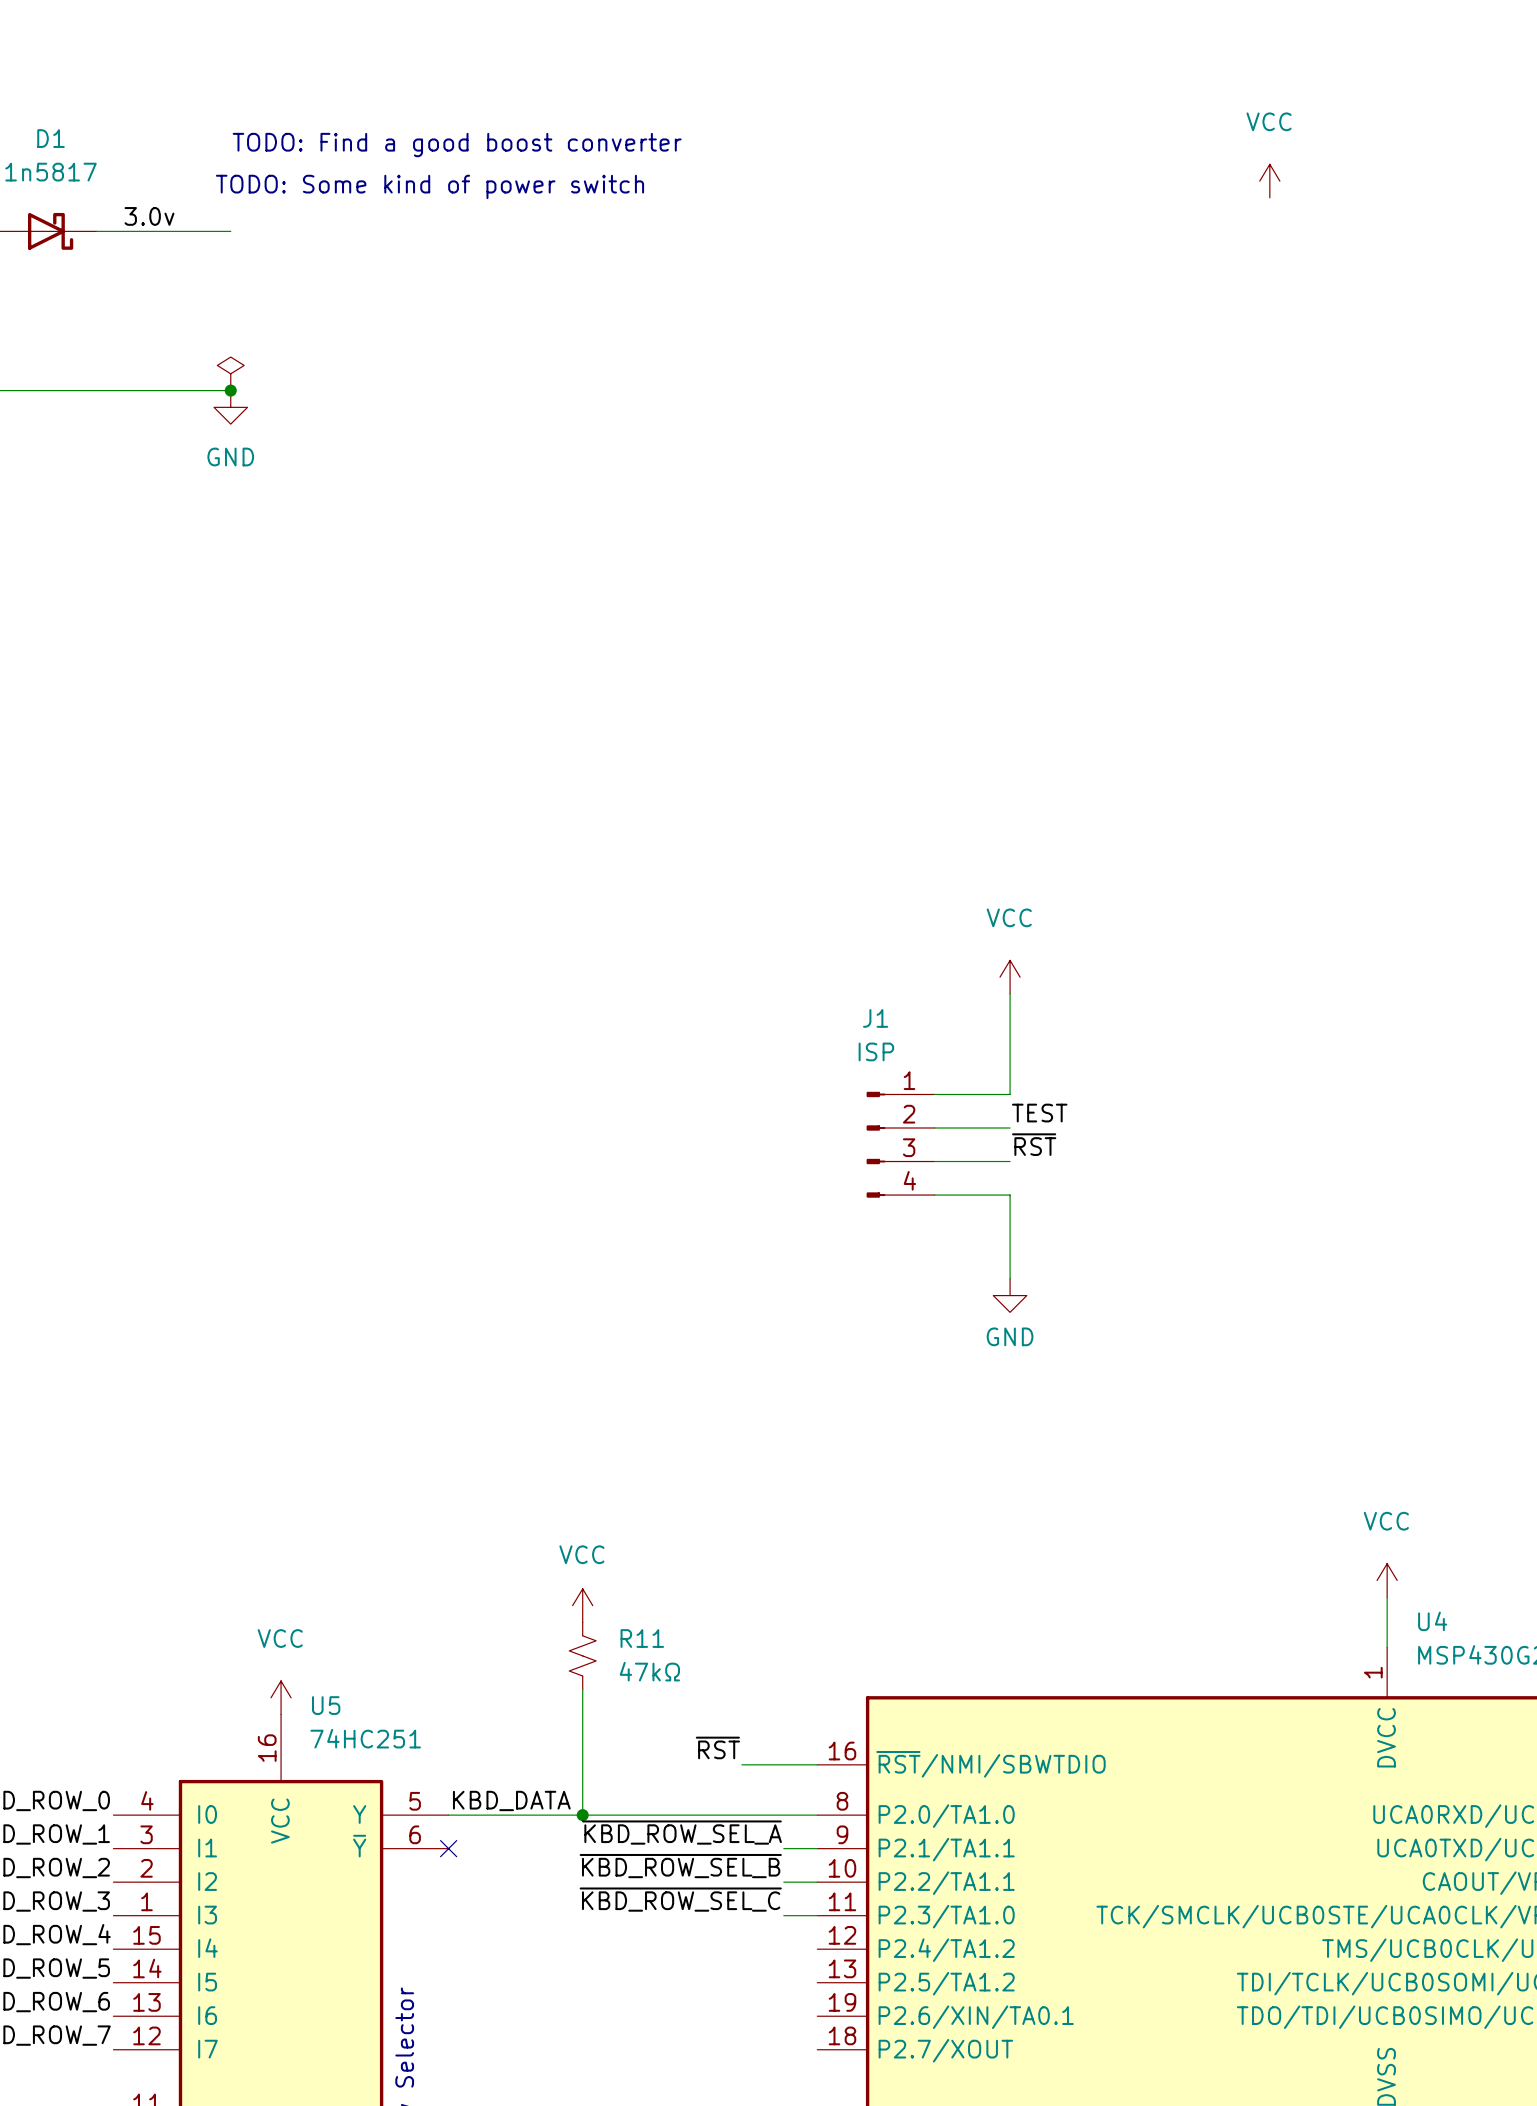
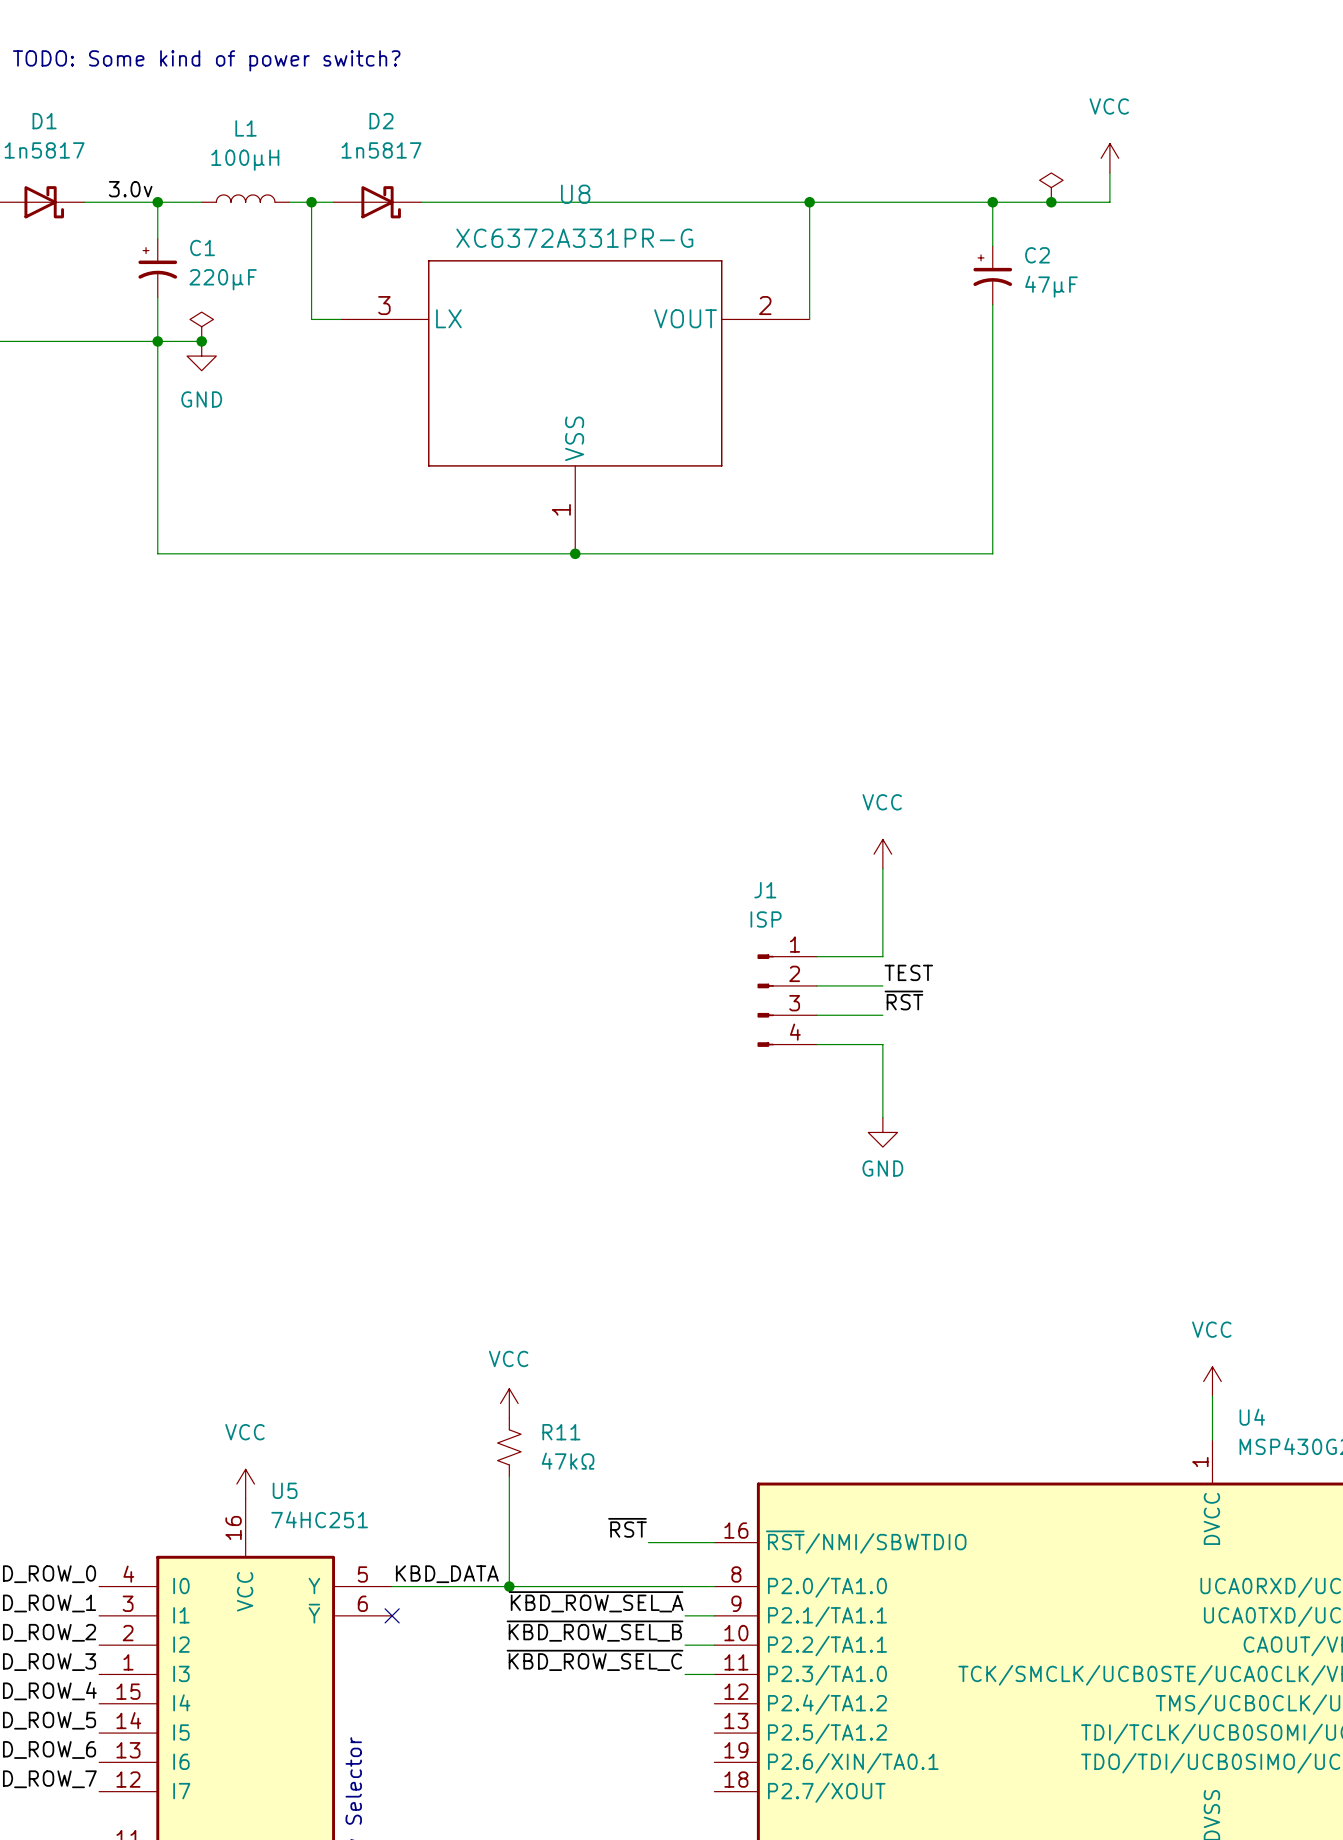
text: none -> TODO: Some kind of power switch? (206, 60)
text: TODO: Find a good boost converter (457, 145) -> none
text: TODO: Some kind of power switch (430, 186) -> none
wire: none -> (1109, 172) (1109, 202) (421, 202)
power symbol: none -> (1051, 187)
L1: none -> 100µH (245, 198)
wire: none -> (157, 202) (157, 238)
junction: none -> (157, 202)
wire: none -> (289, 202) (333, 202)
wire: none -> (311, 202) (311, 319) (340, 319)
junction: none -> (311, 202)
D2: none -> 1n5817 (377, 202)
wire: none -> (809, 202) (809, 319)
junction: none -> (809, 202)
wire: none -> (992, 202) (992, 246)
junction: none -> (992, 202)
junction: none -> (1051, 202)
C1: none -> 220µF (157, 268)
C2: none -> 47µF (992, 275)
wire: none -> (157, 297) (157, 553) (992, 553) (992, 304)
junction: none -> (157, 341)
U8: none -> XC6372A331PR-G (575, 406)
junction: none -> (575, 553)

